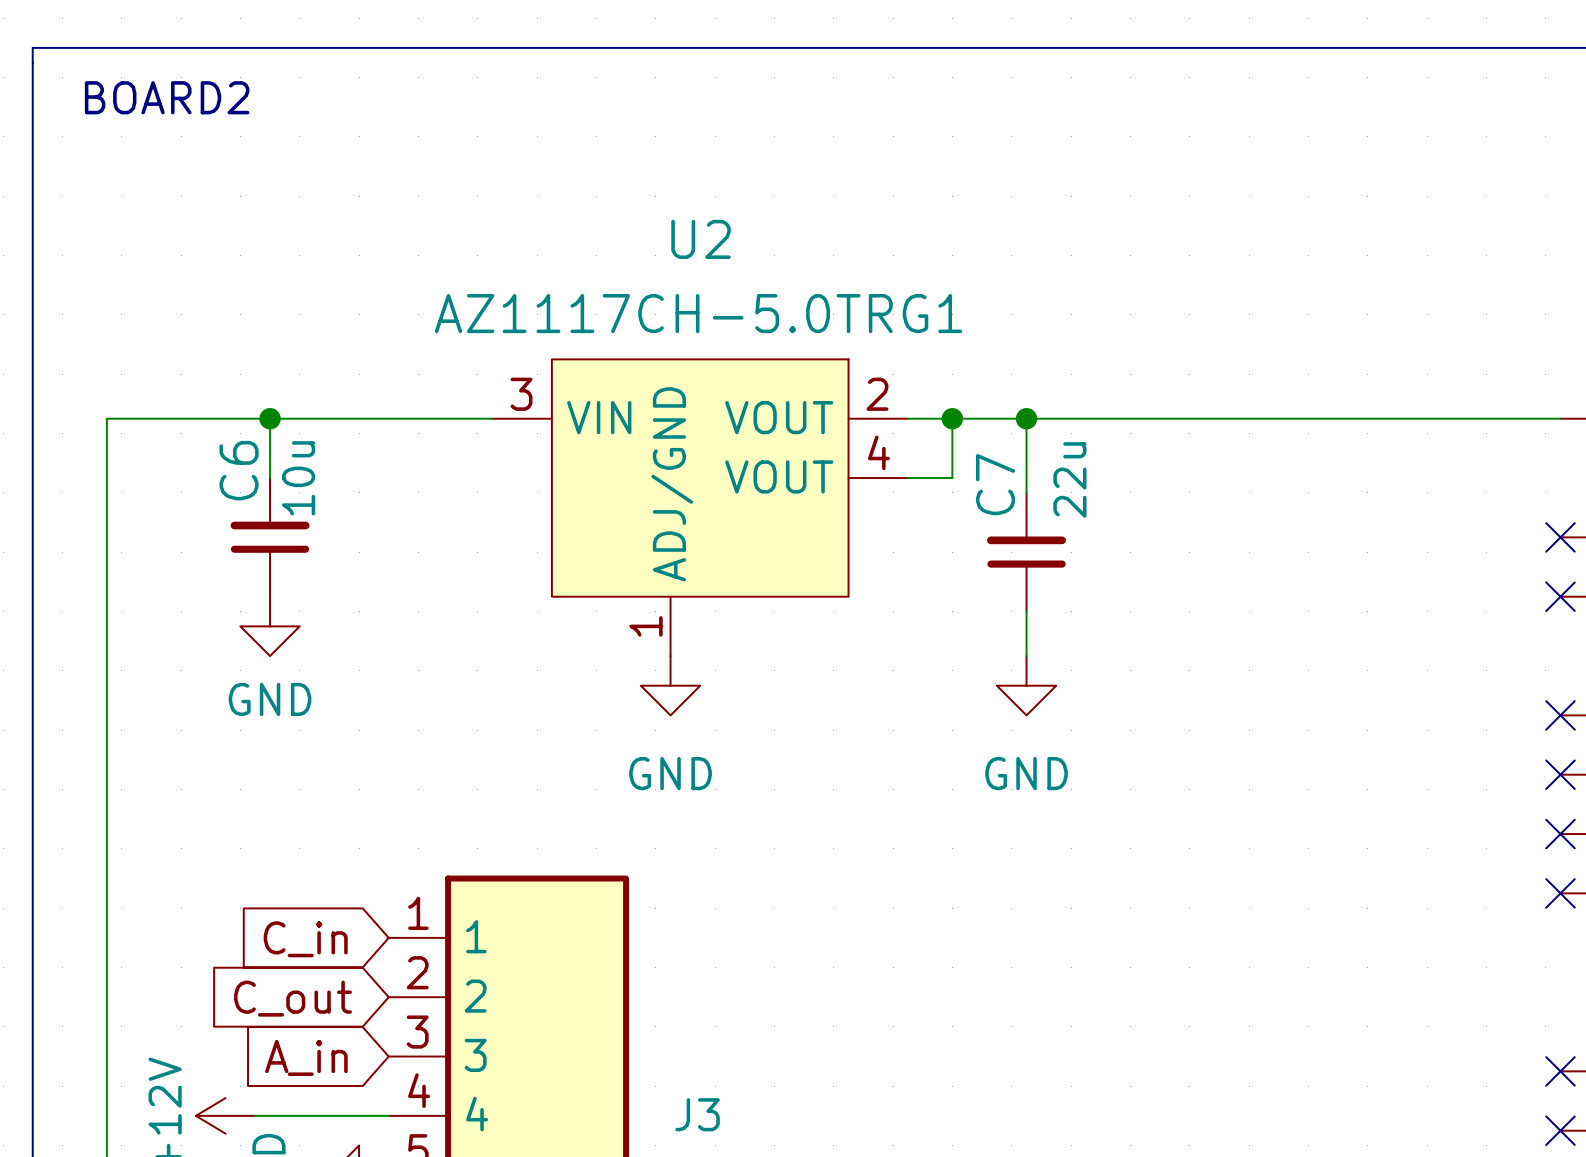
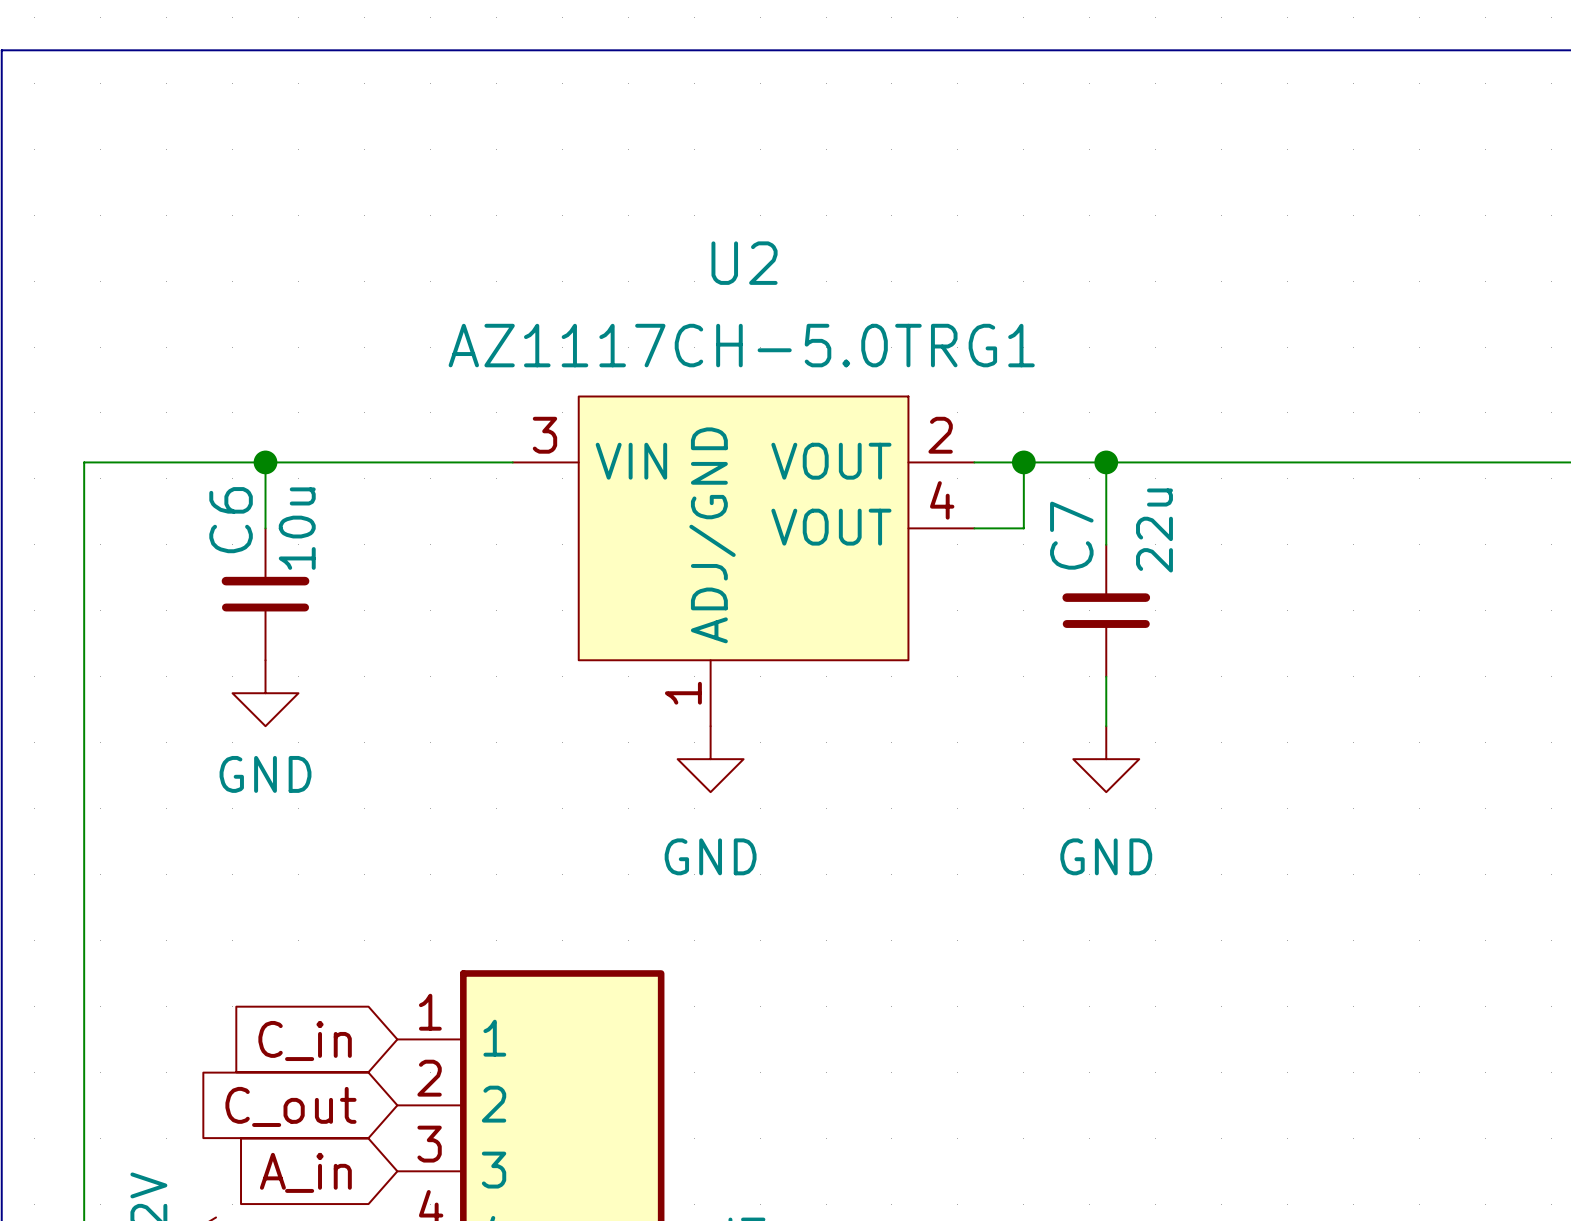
text: BOARD2 (167, 97) -> none

